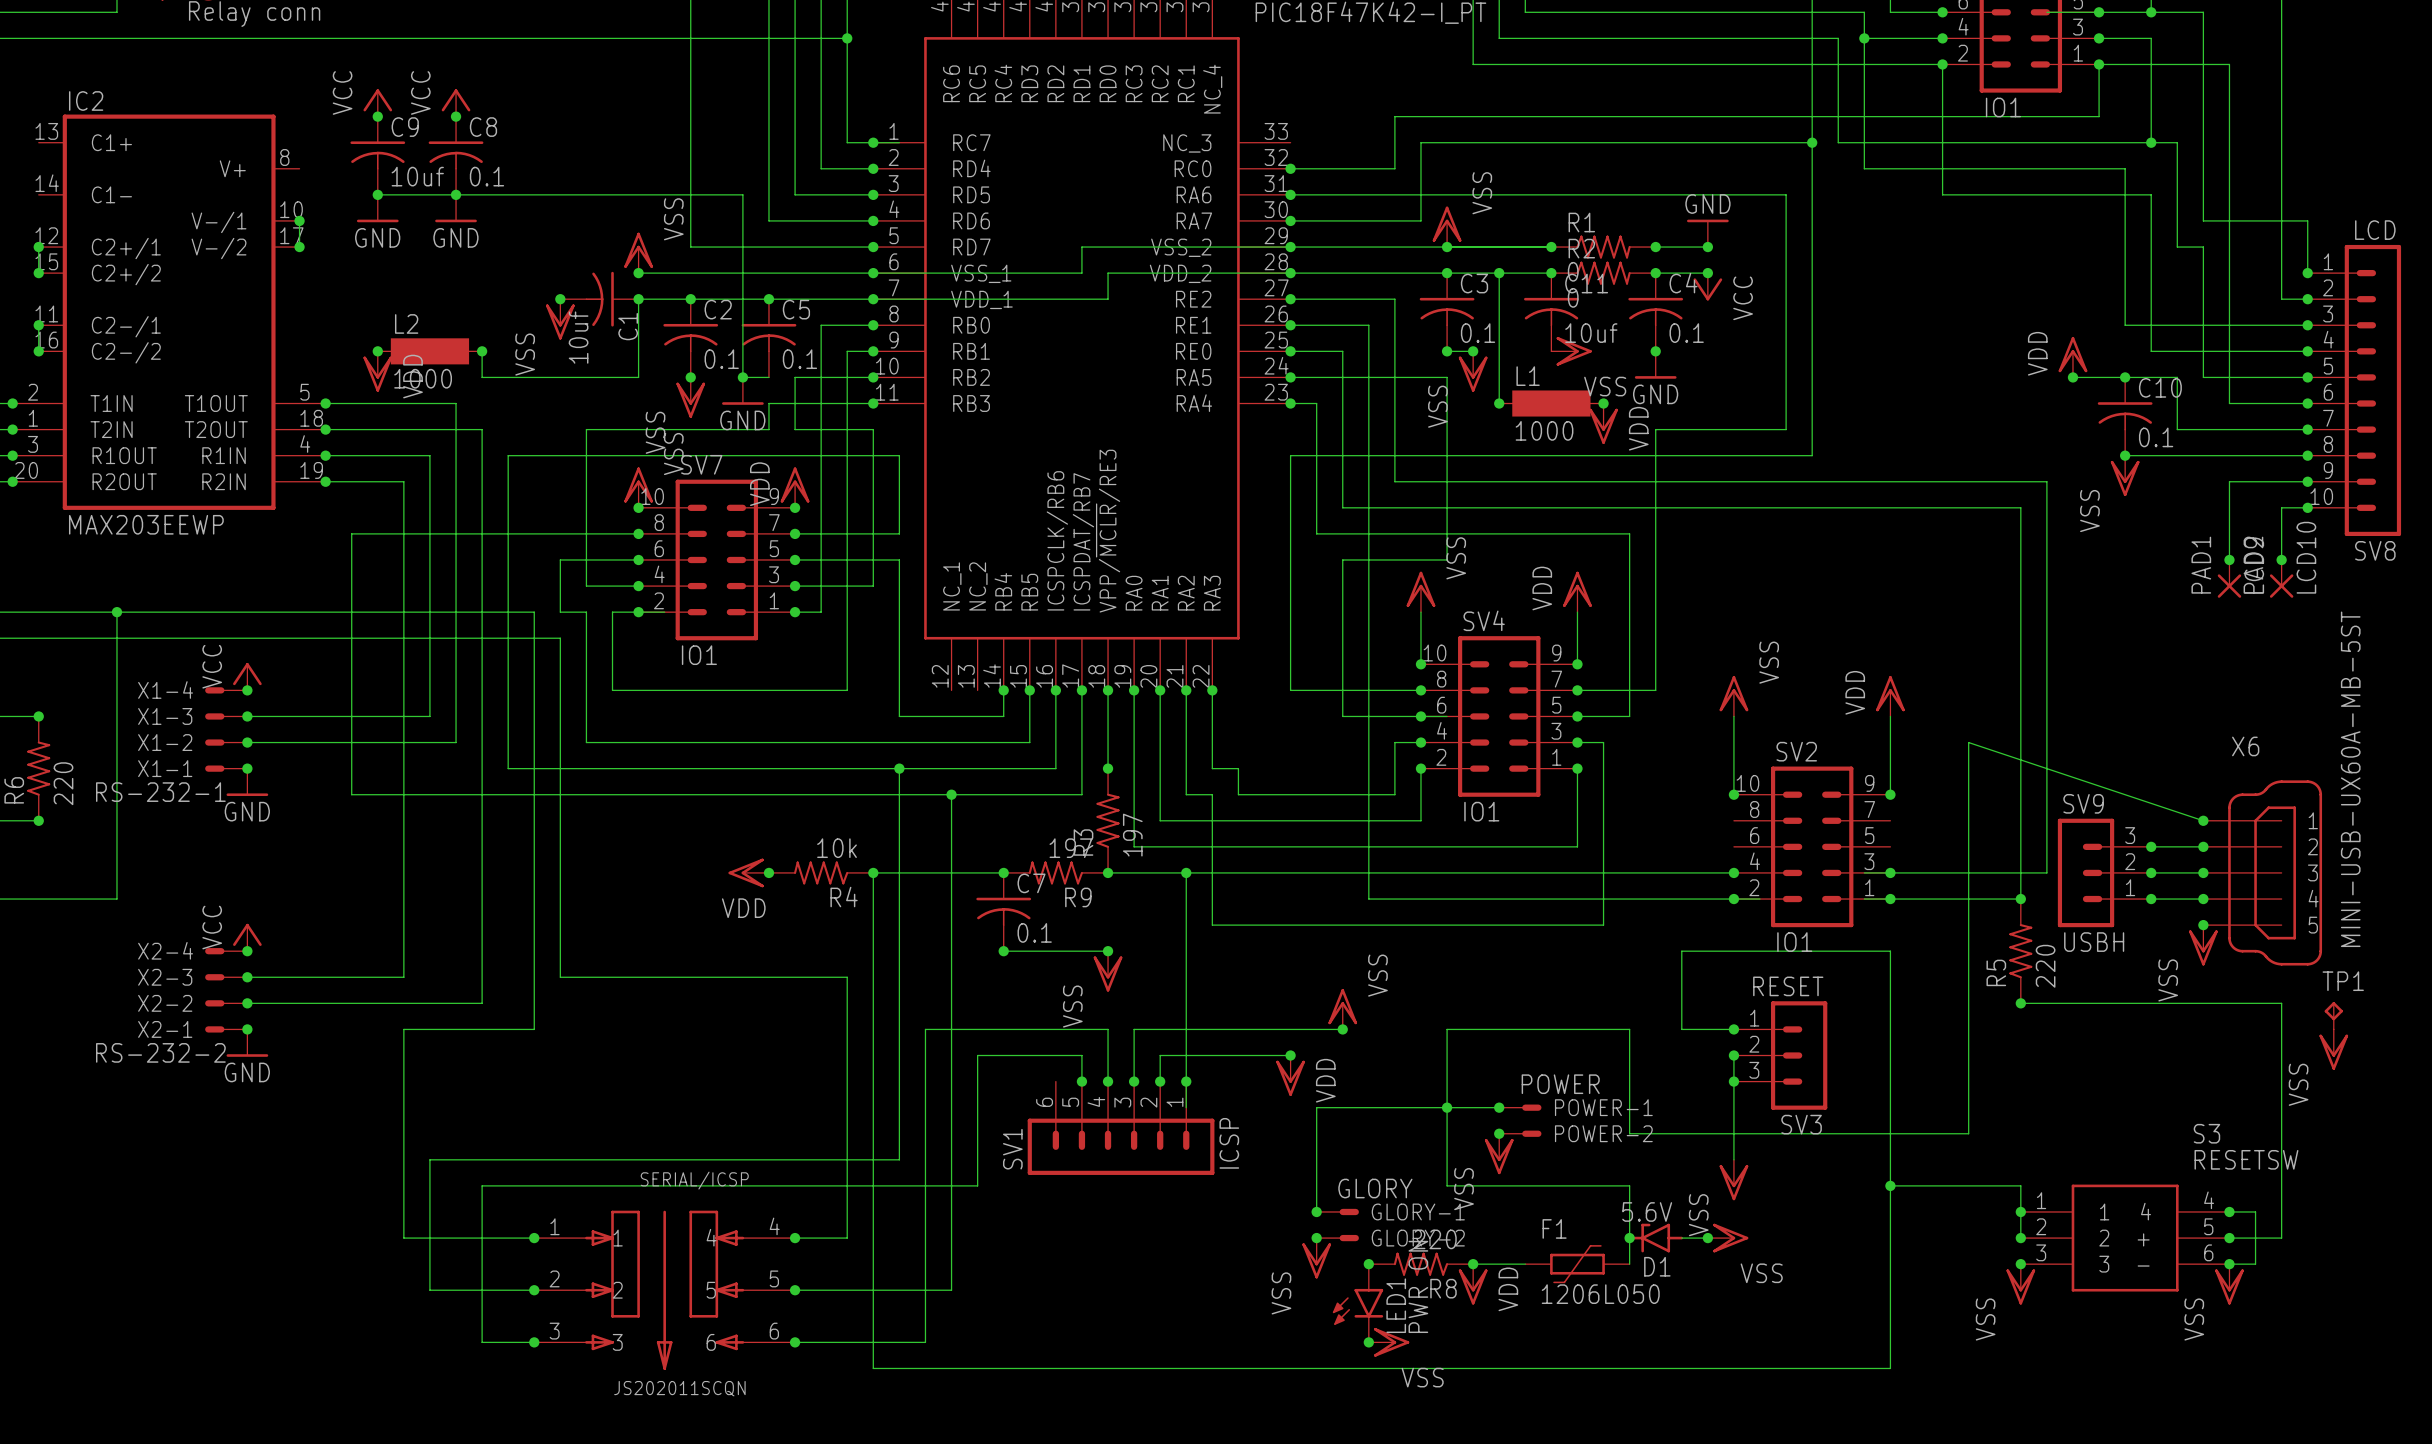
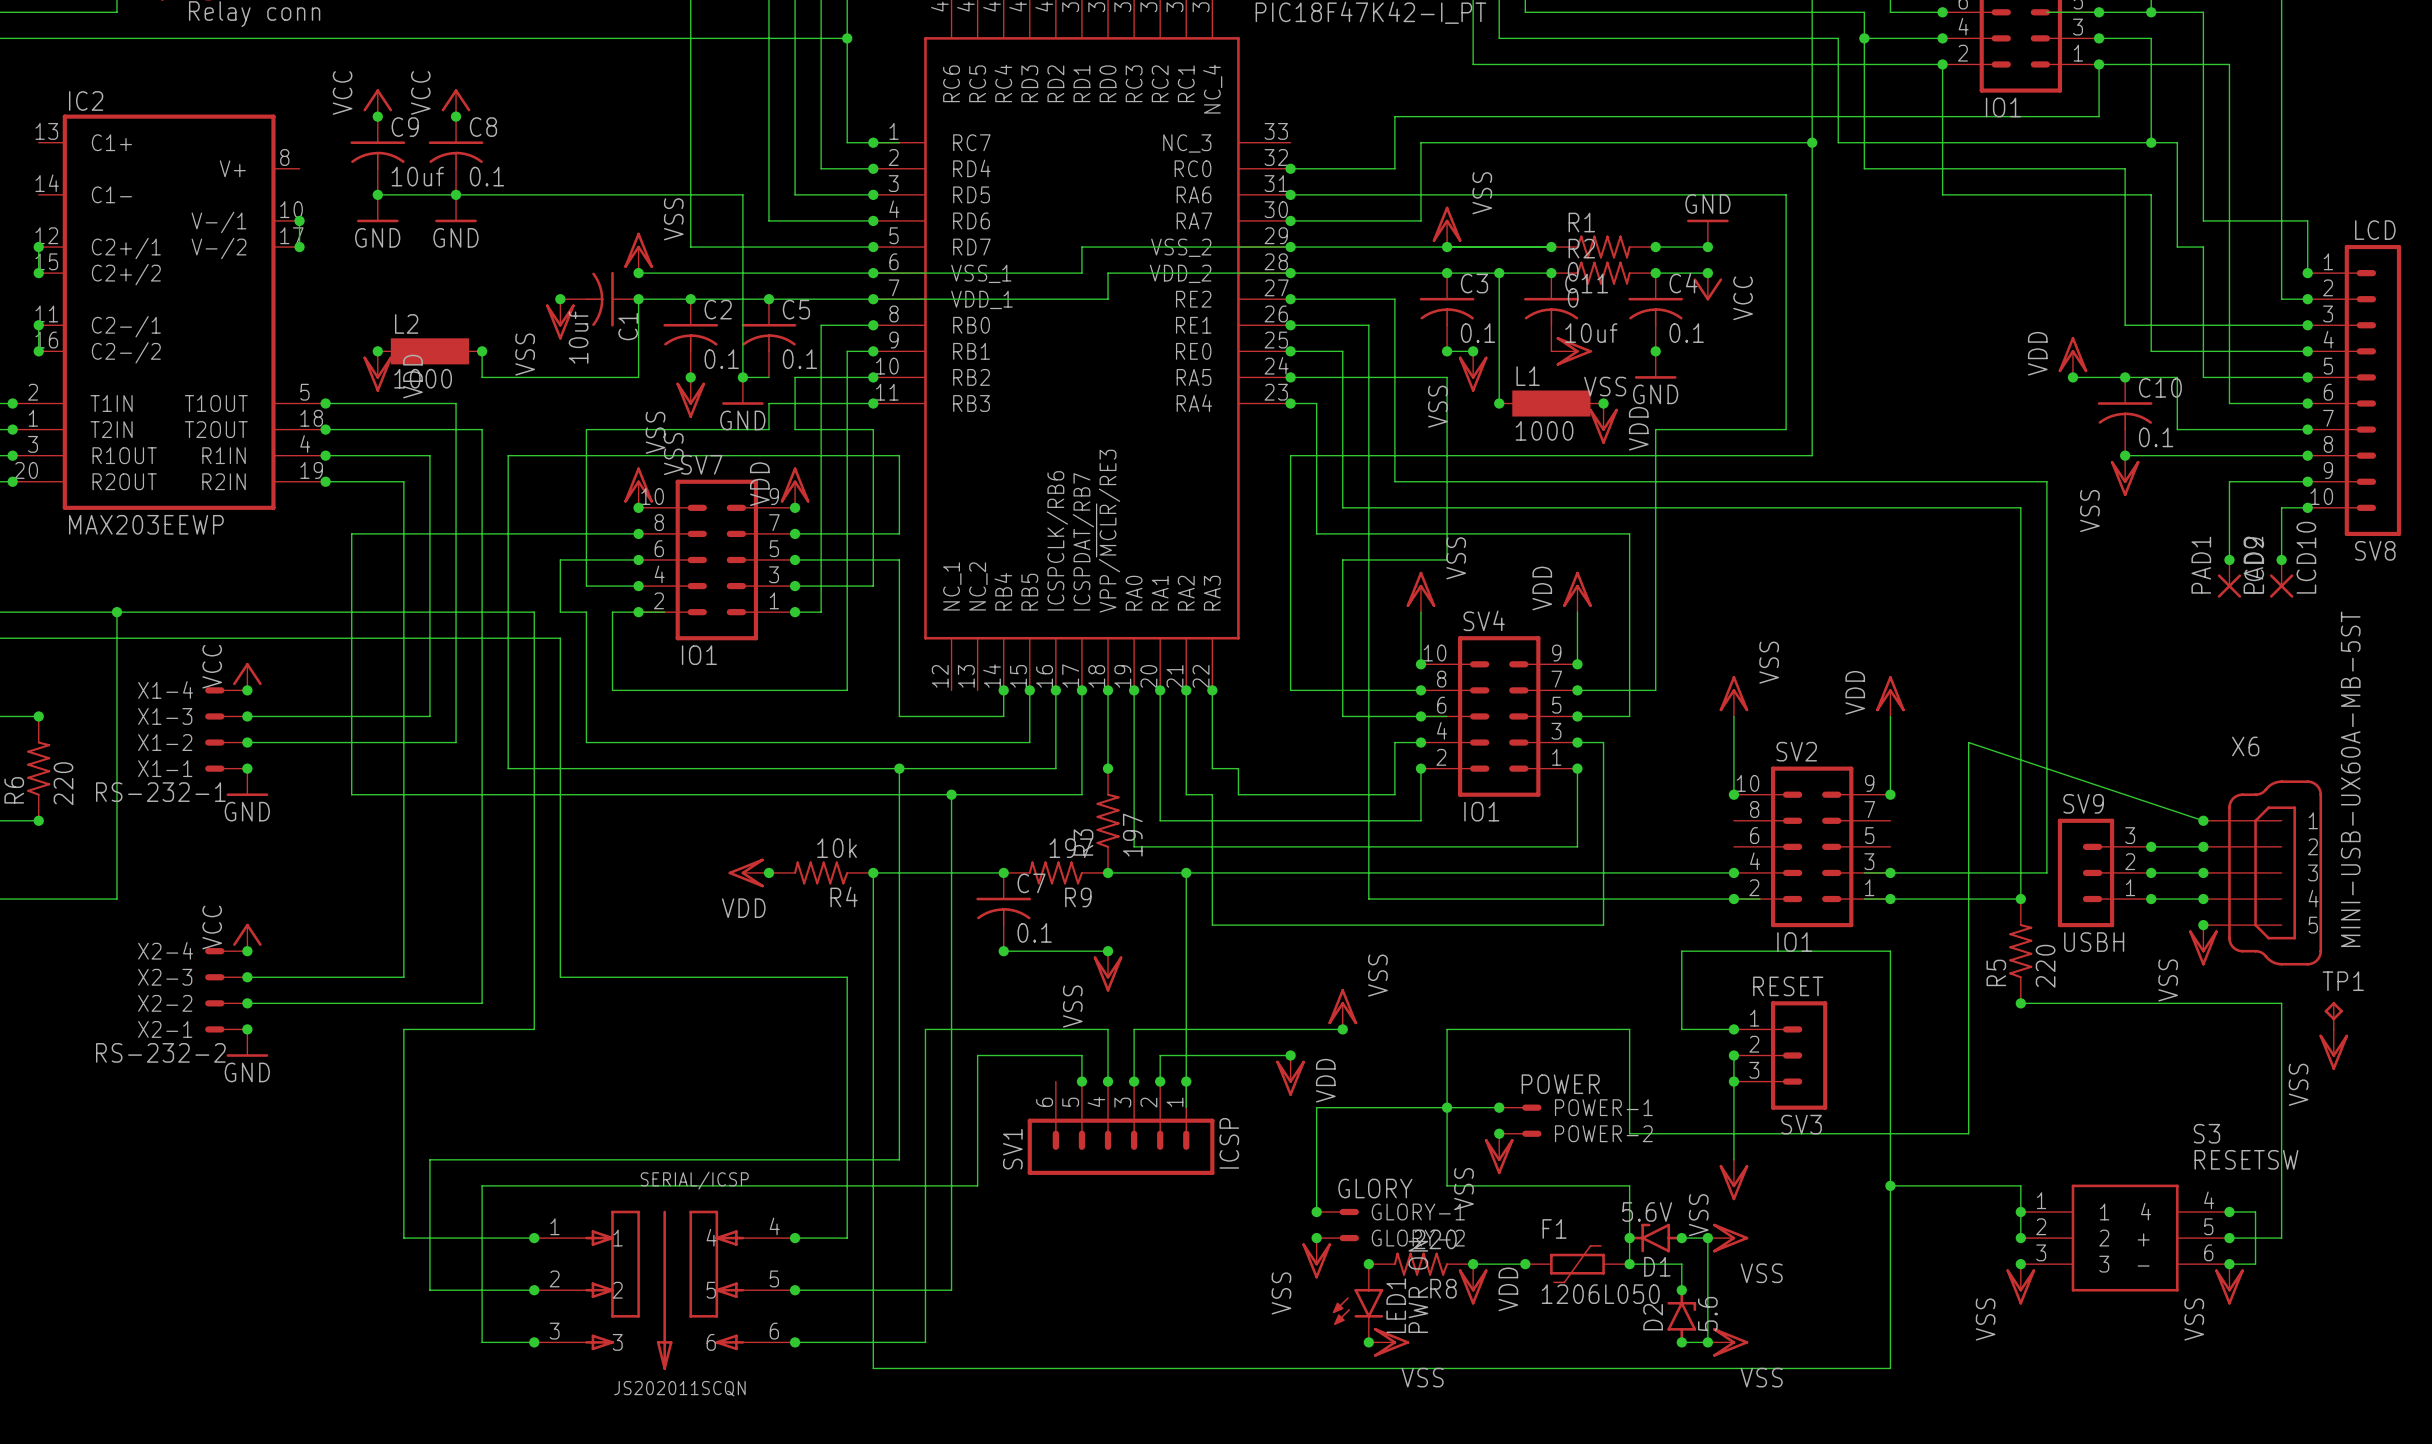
junction: none -> (1681, 1238)
wire: none -> (1707, 1238) (1707, 1342) (1681, 1342)
junction: none -> (1525, 1264)
wire: none -> (1629, 1264) (1681, 1264) (1681, 1290)
junction: none -> (1629, 1264)
junction: none -> (1681, 1290)
D2: none -> 5.6 (1681, 1316)
junction: none -> (1681, 1342)
junction: none -> (1707, 1342)
power symbol: none -> VSS (1728, 1342)

